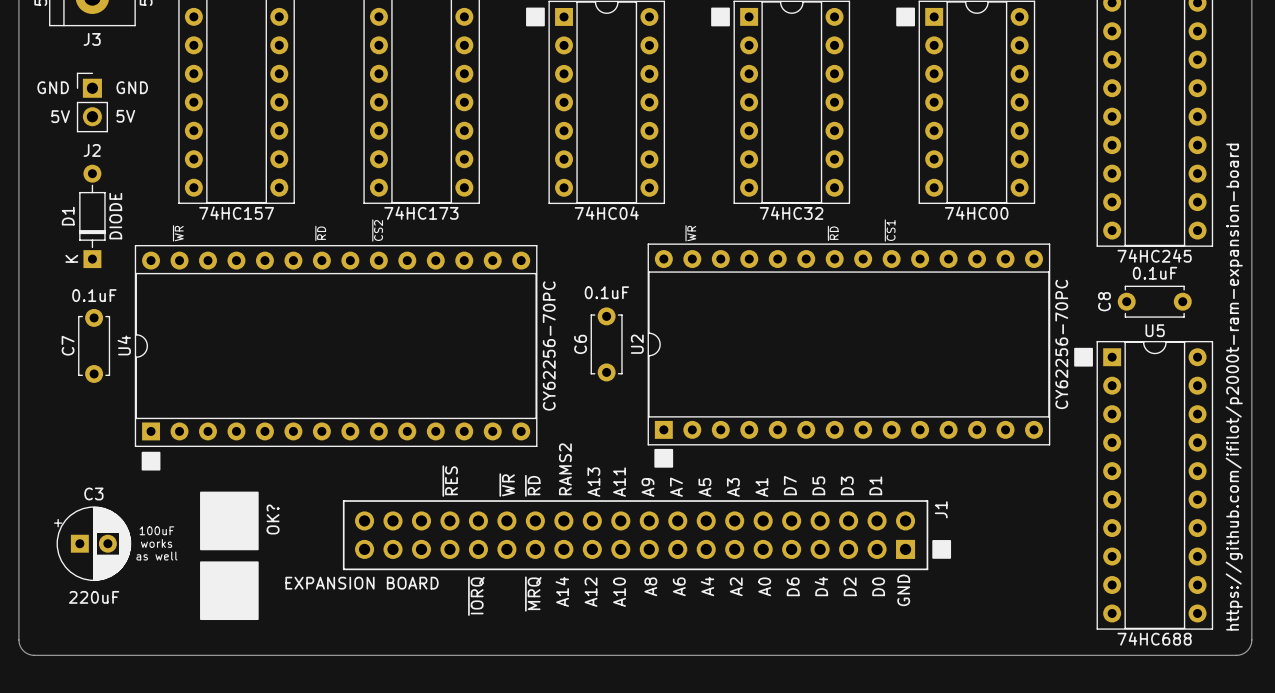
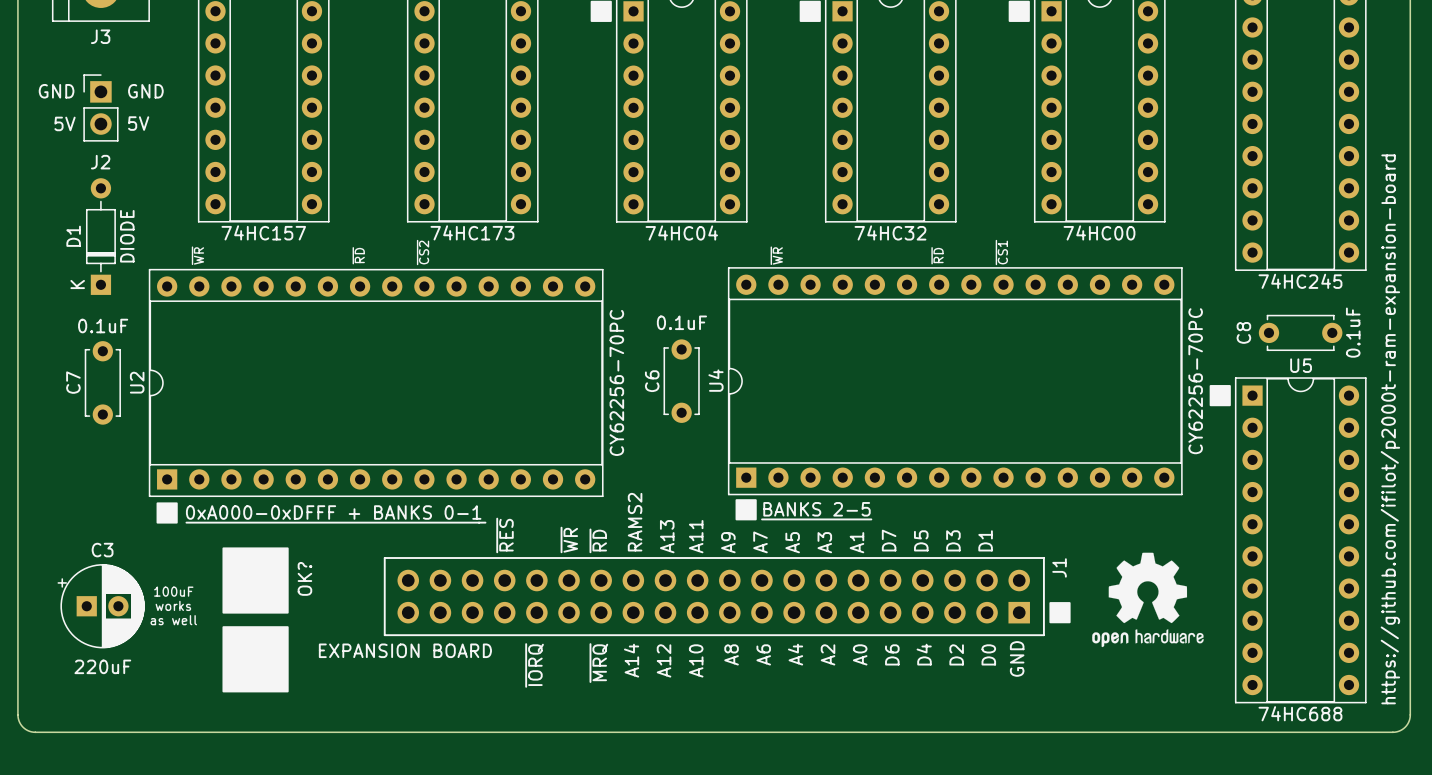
C8 value rotation: 0° (1155, 273) -> 90° counterclockwise (1353, 332)
U2 name: U2 (637, 344) -> U4 (715, 380)
U4 name: U4 (124, 345) -> U2 (137, 382)
text: none -> BANKS 2-5 (816, 509)
text: none -> 0xA000-0xDFFF + BANKS 0-1 (333, 512)
line: none -> (762, 519) (871, 519)
line: none -> (186, 522) (485, 522)
drawing: none -> [1092, 552, 1204, 648]

